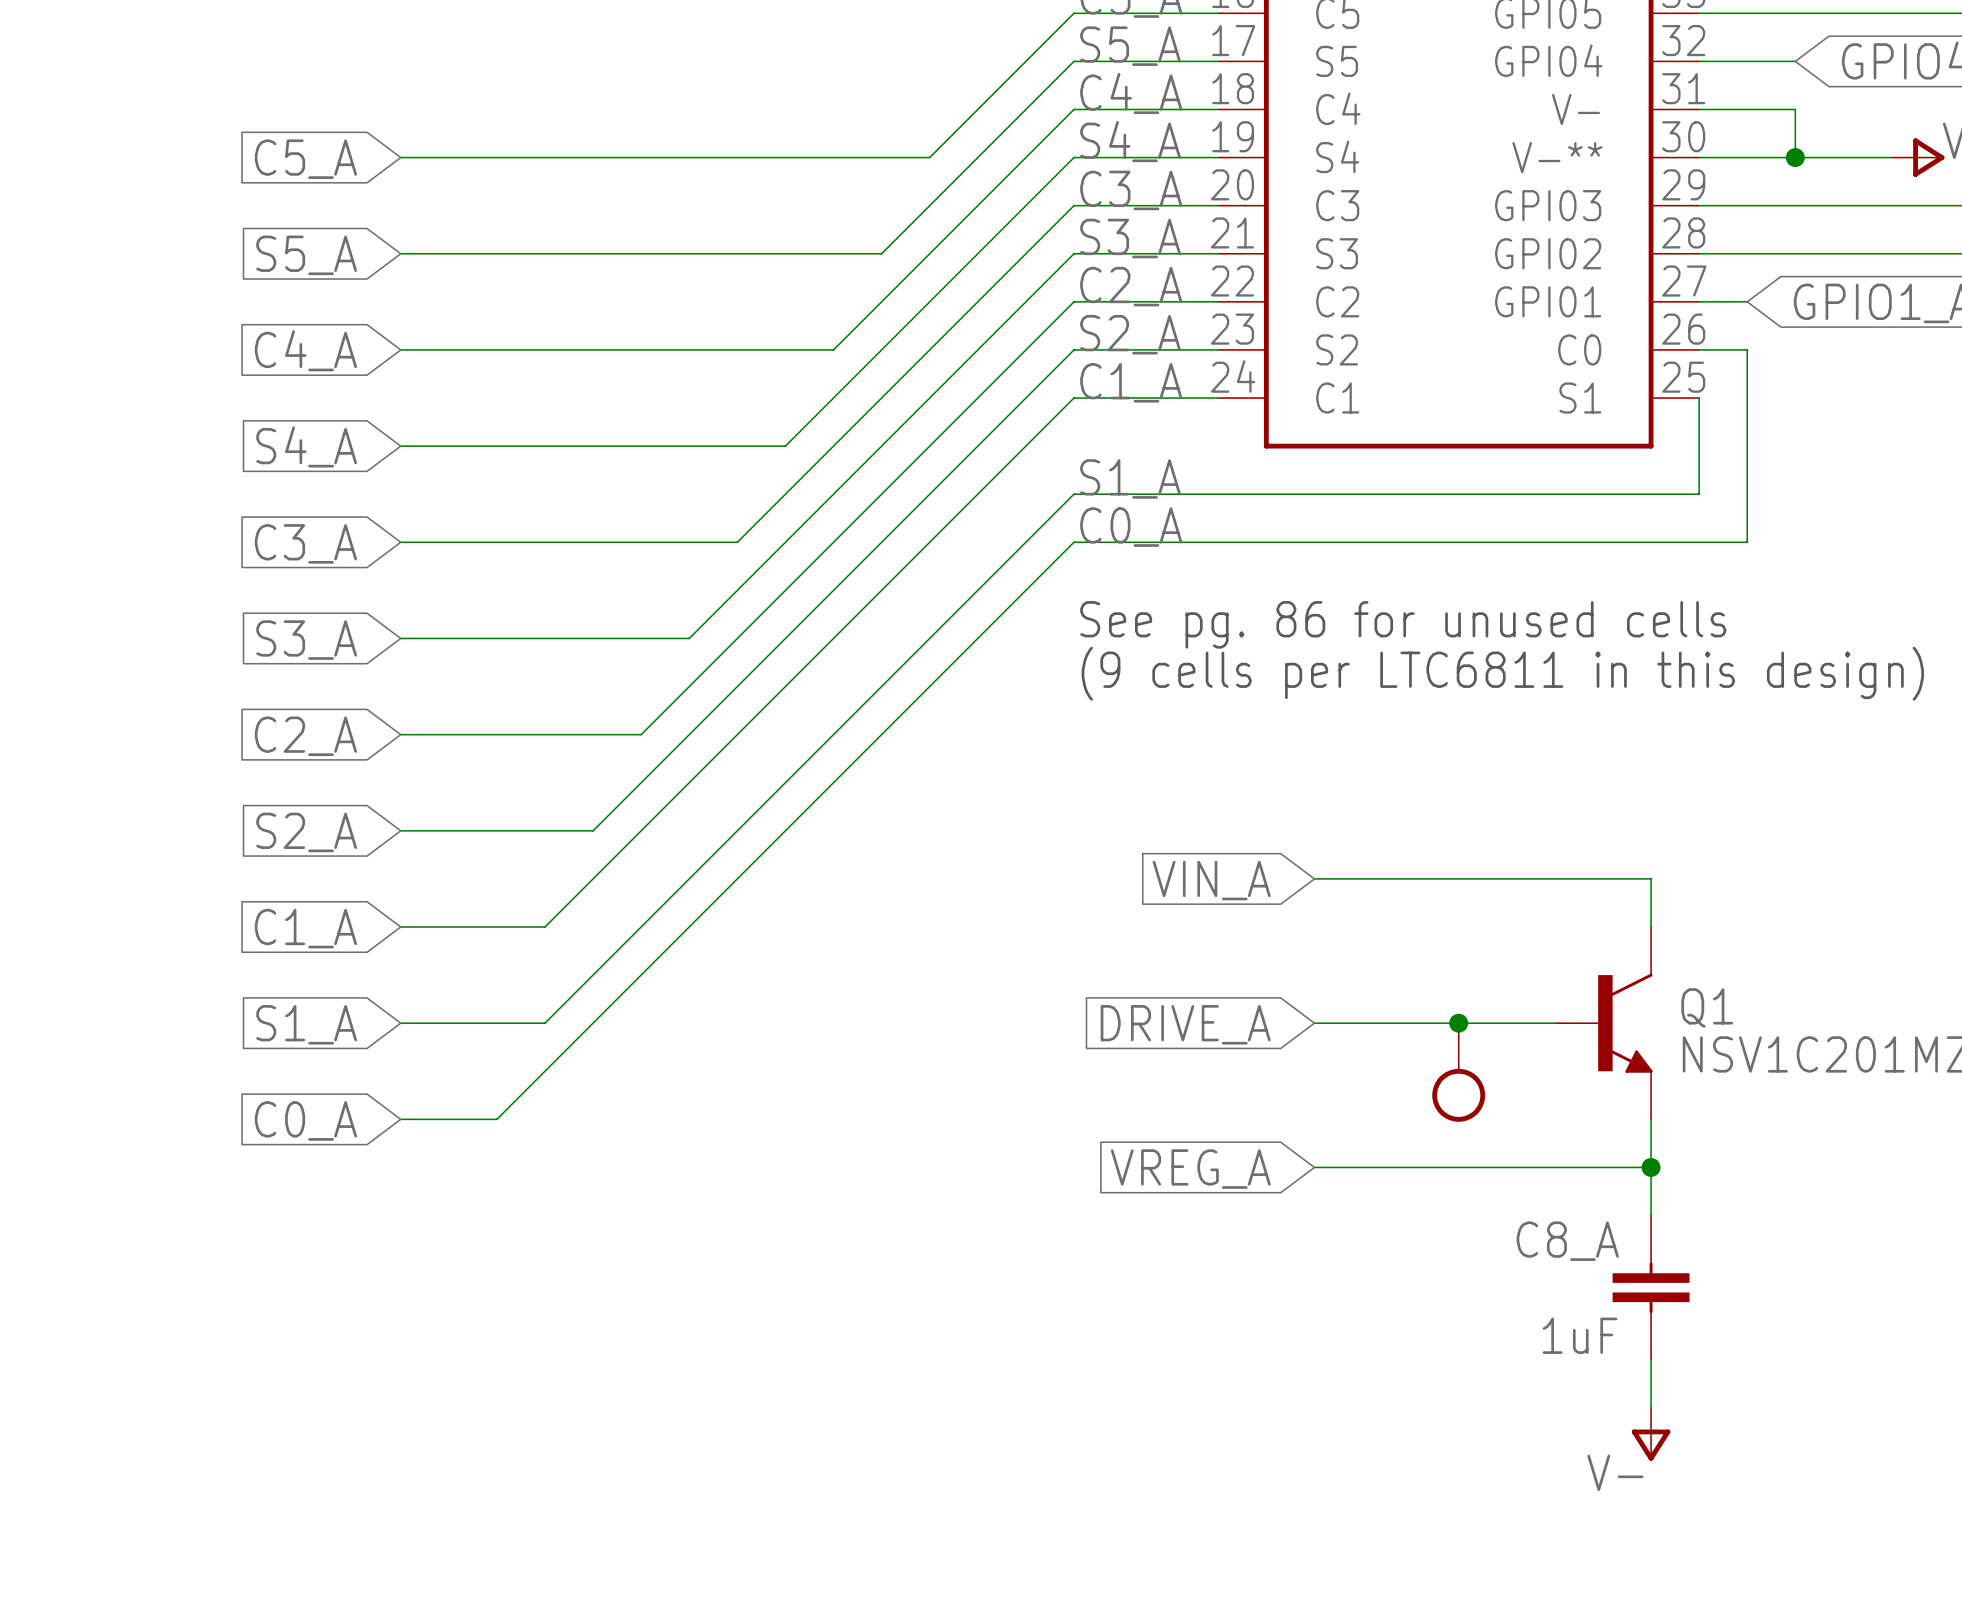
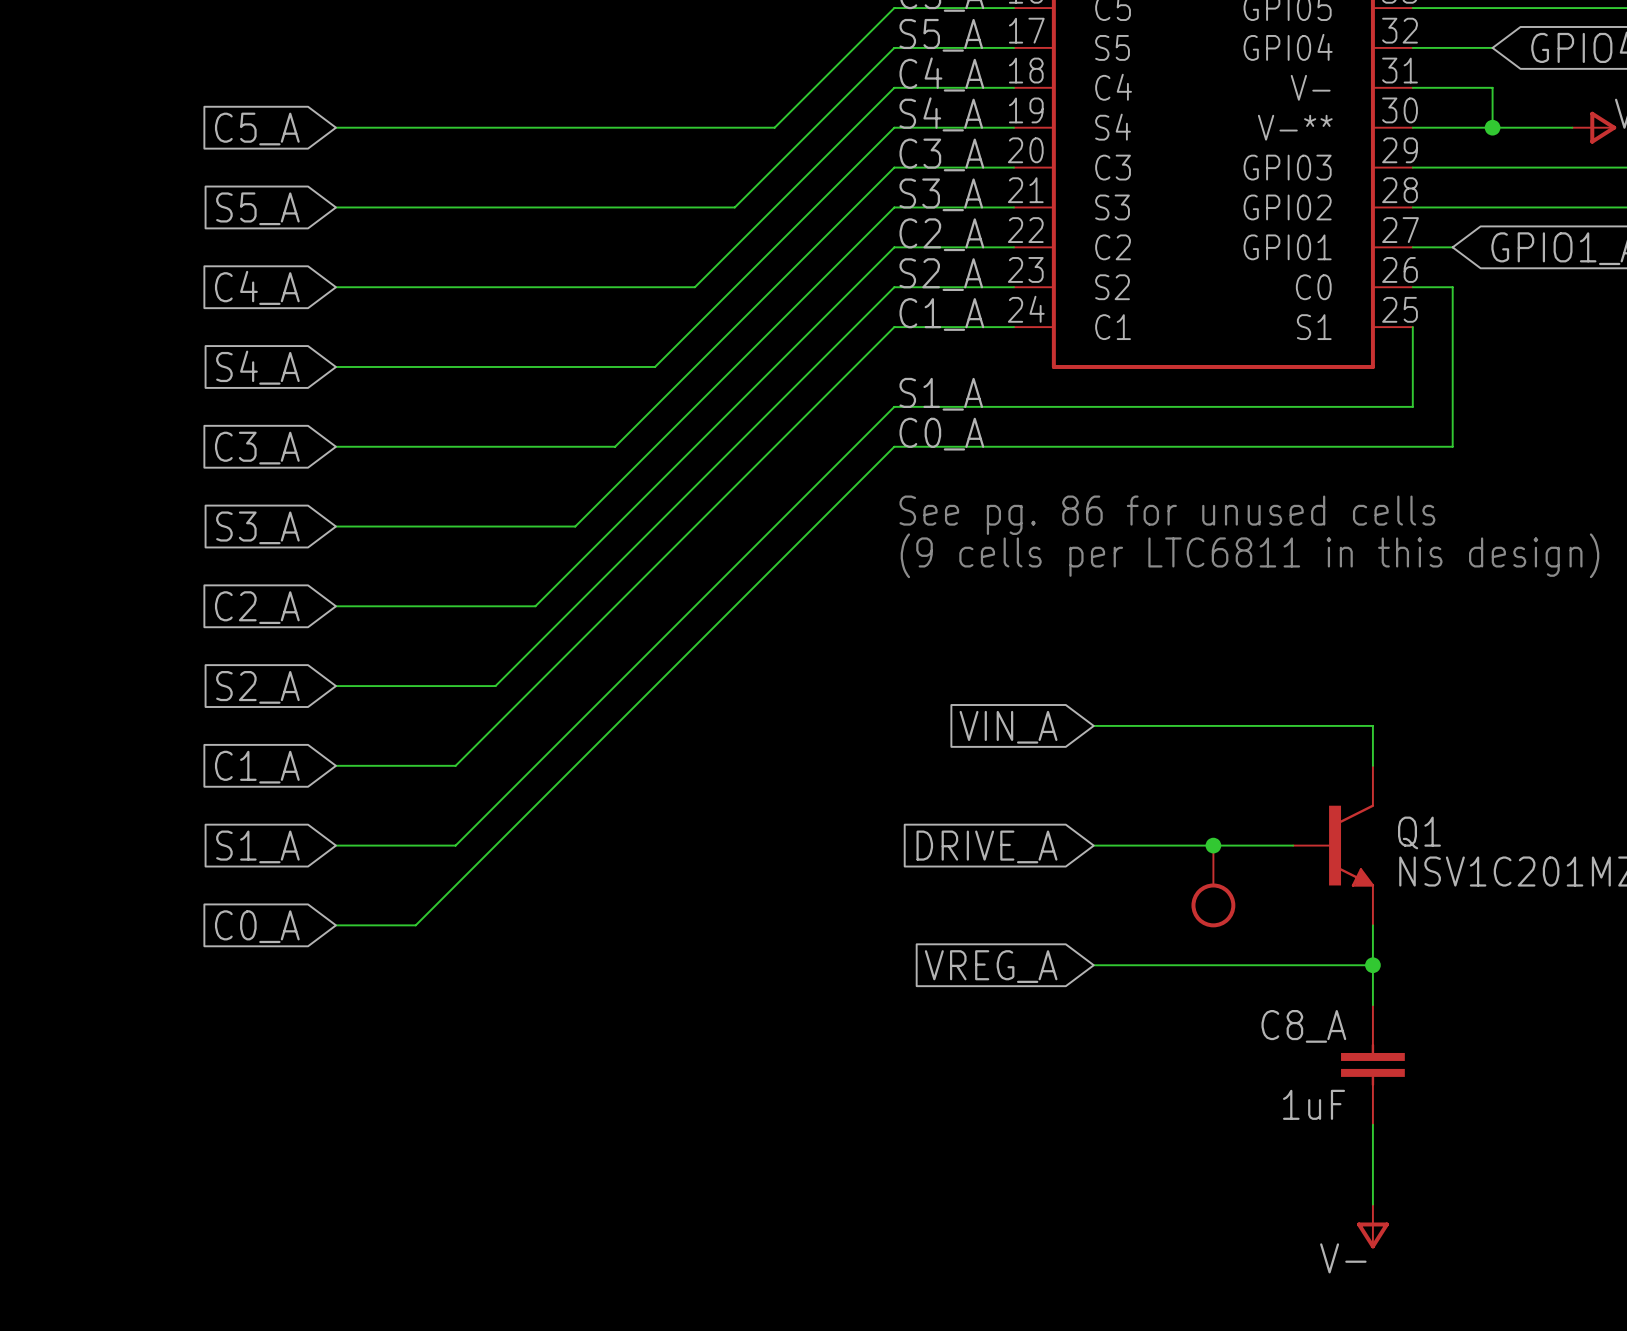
power symbol position: V- (1651, 1434) -> V- (1372, 1226)

